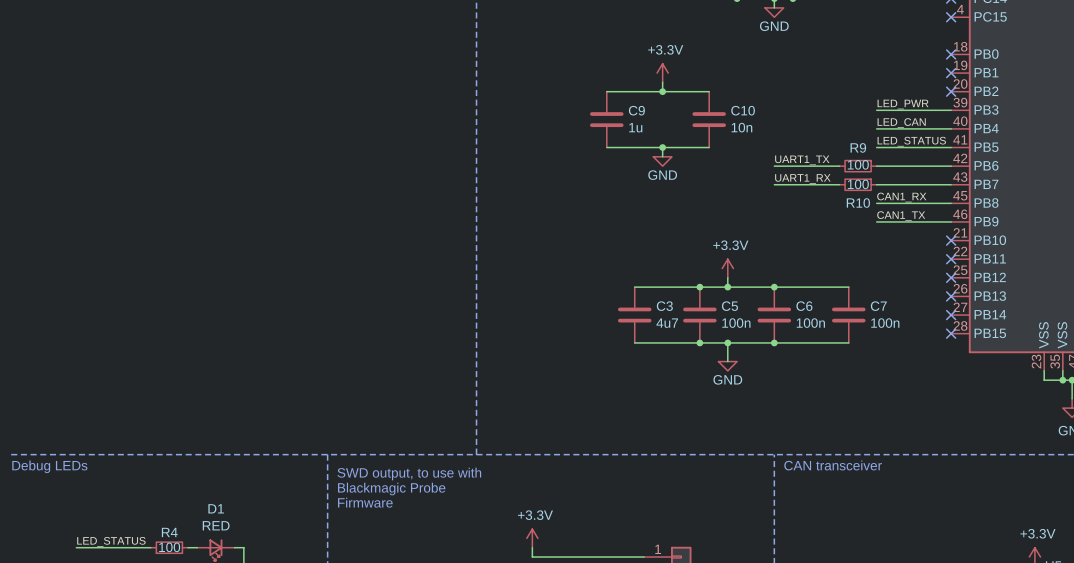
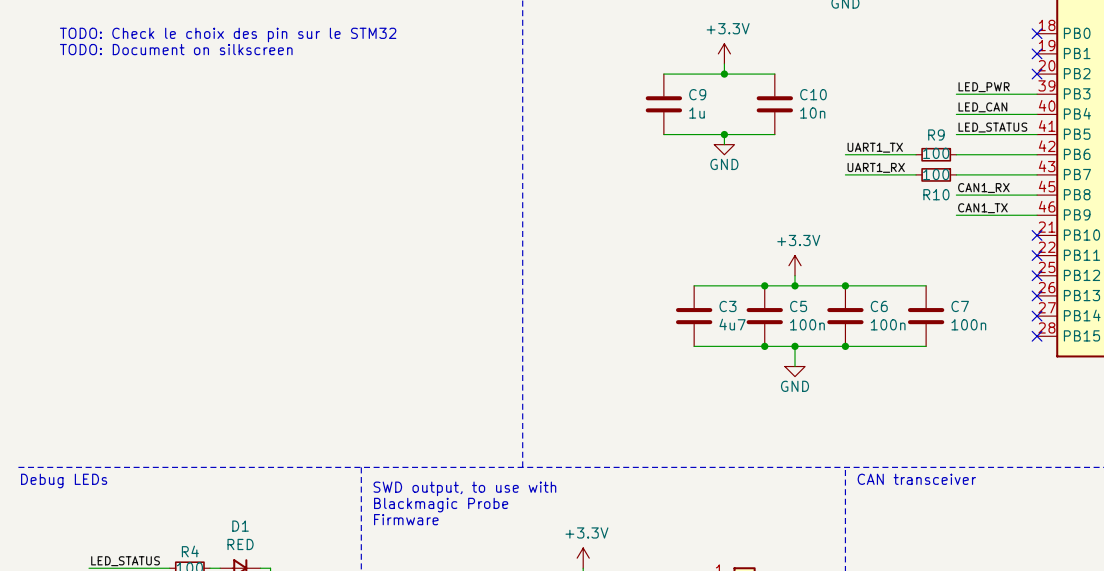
text: none -> TODO: Check le choix des pin sur le STM32 (228, 35)
text: none -> TODO: Document on silkscreen (176, 49)

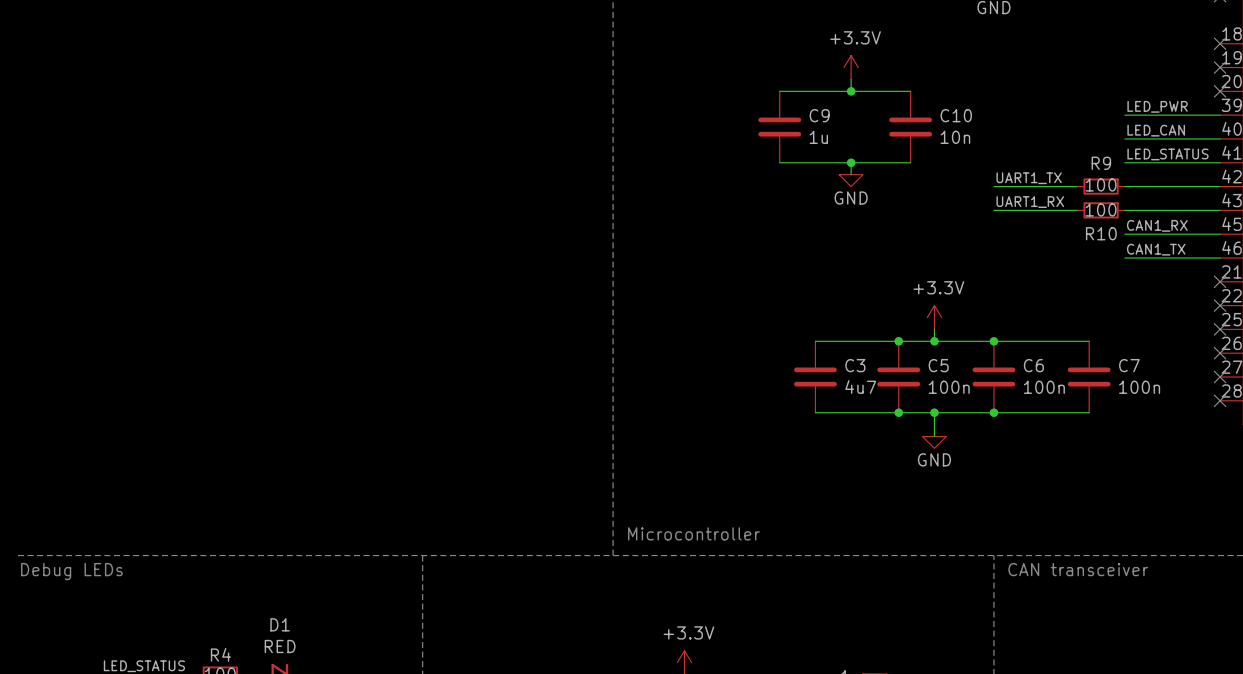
text: TODO: Check le choix des pin sur le STM32 (228, 35) -> none
text: TODO: Document on silkscreen (176, 49) -> none
text: none -> Microcontroller (693, 533)
text: SWD output, to use with (464, 488) -> none
text: Blackmagic Probe (441, 505) -> none
text: Firmware (406, 519) -> none

